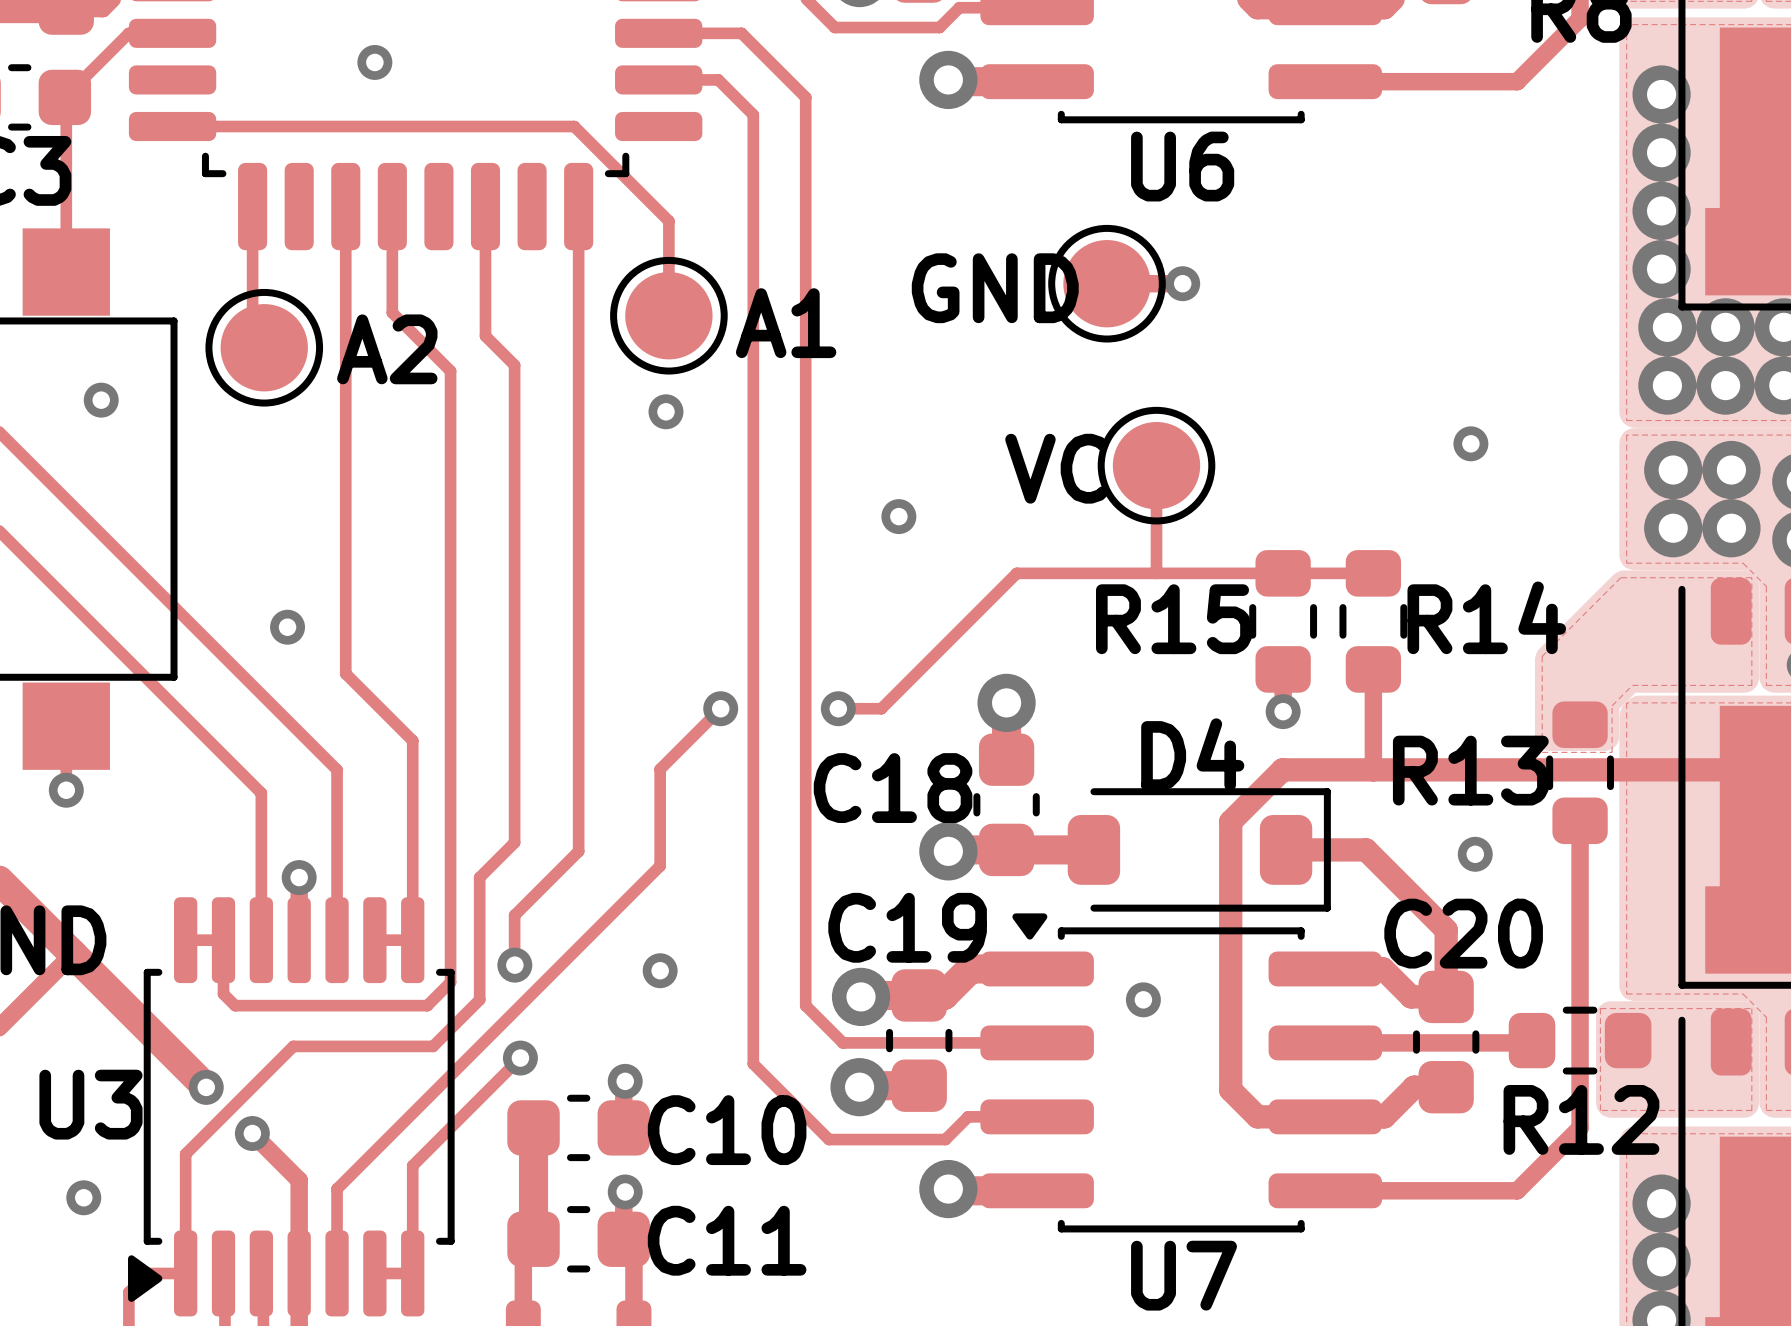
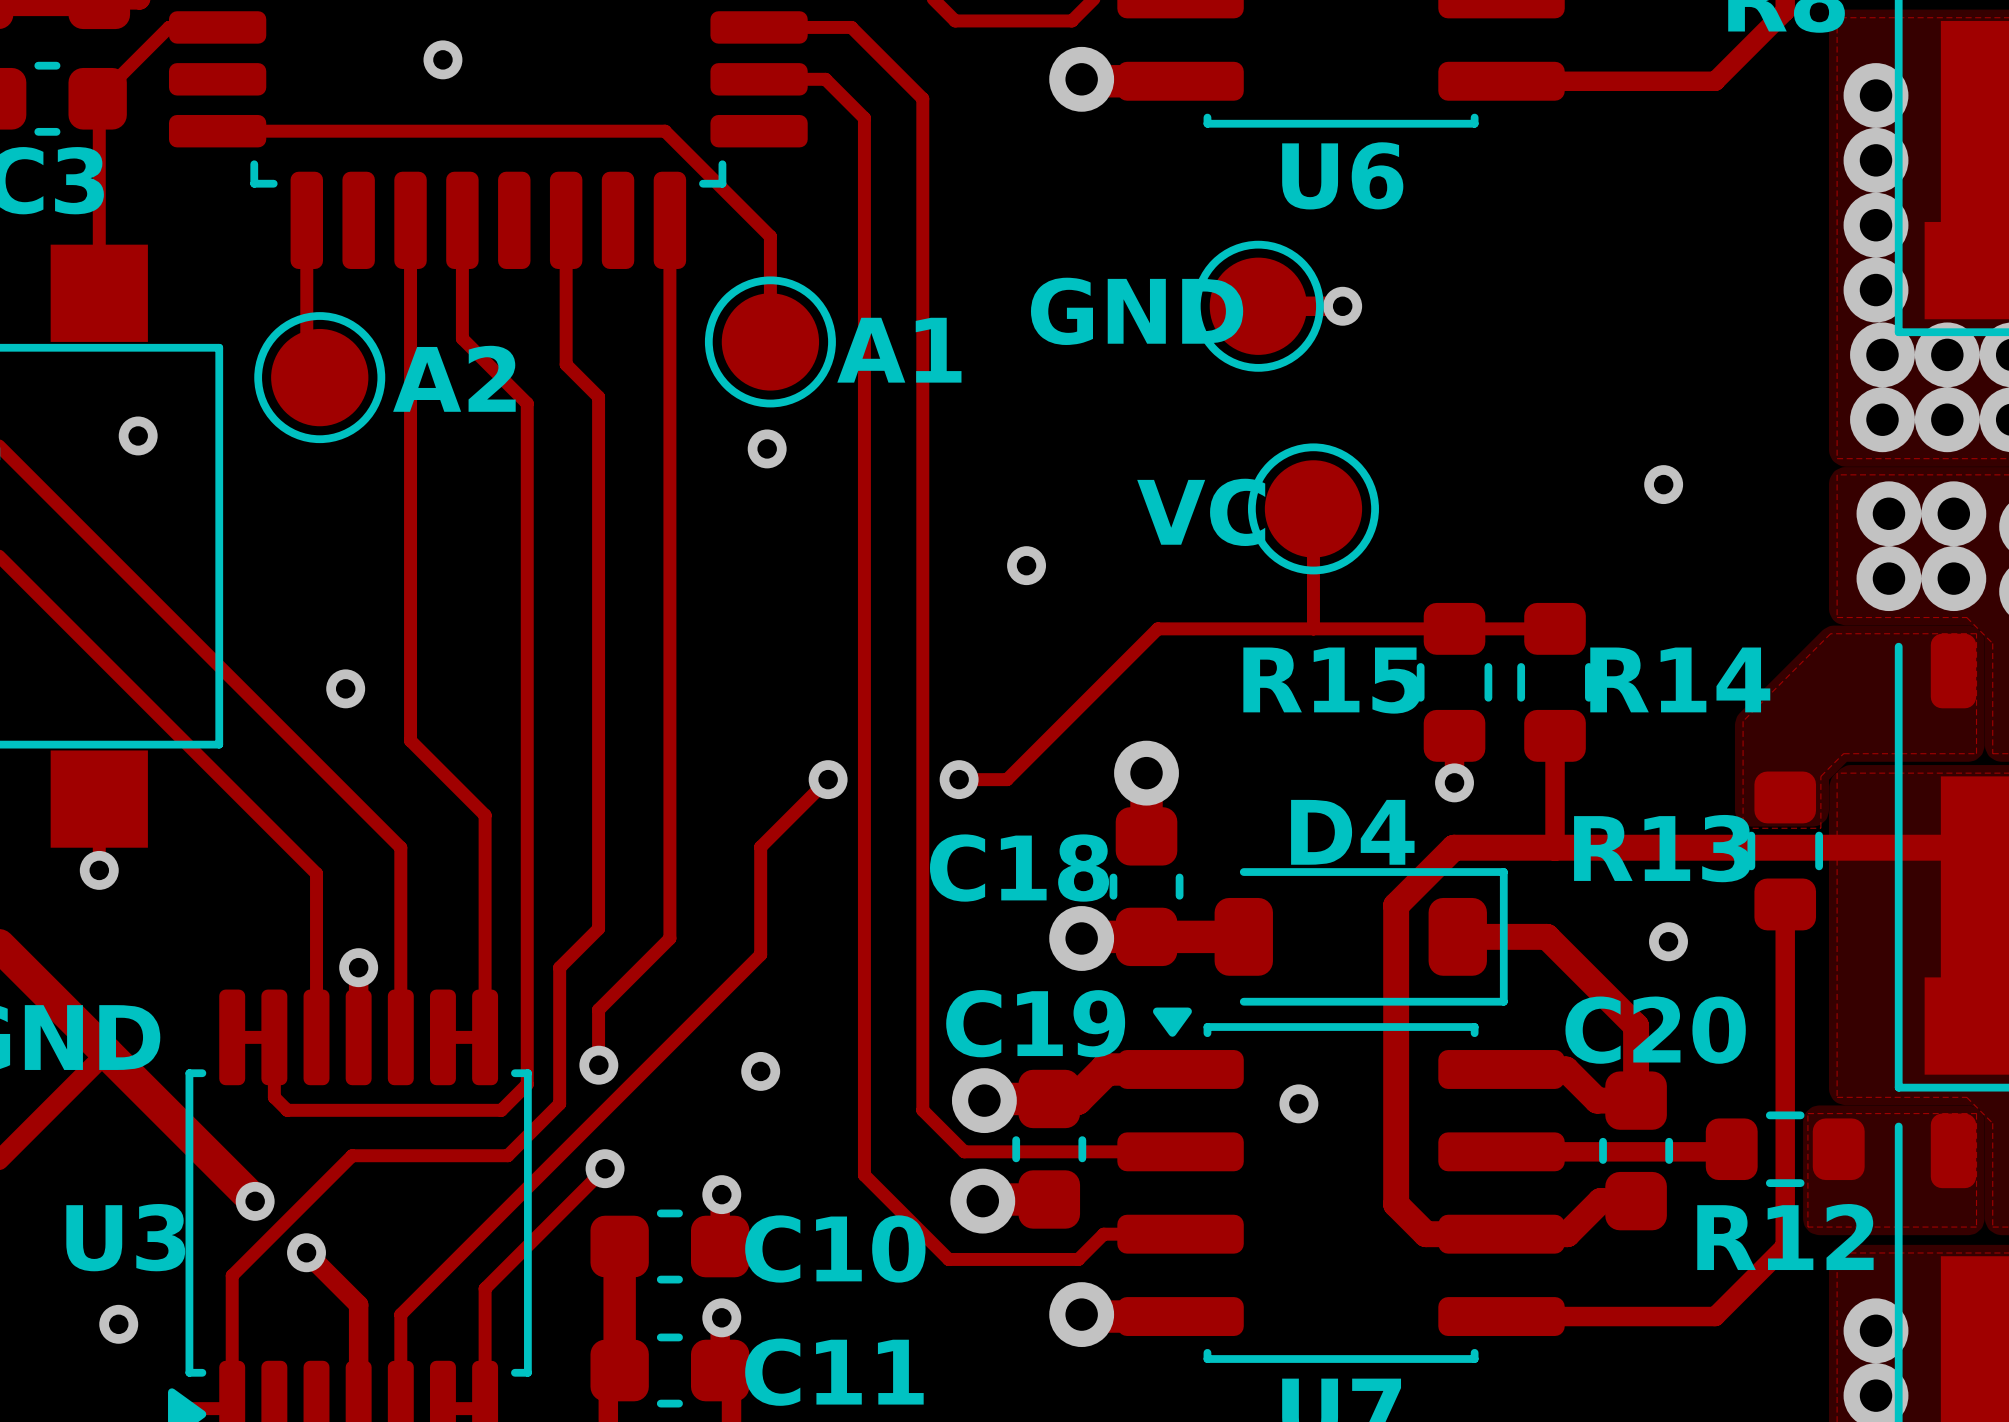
U3 name position: U3 (90, 1104) -> U3 (125, 1237)

